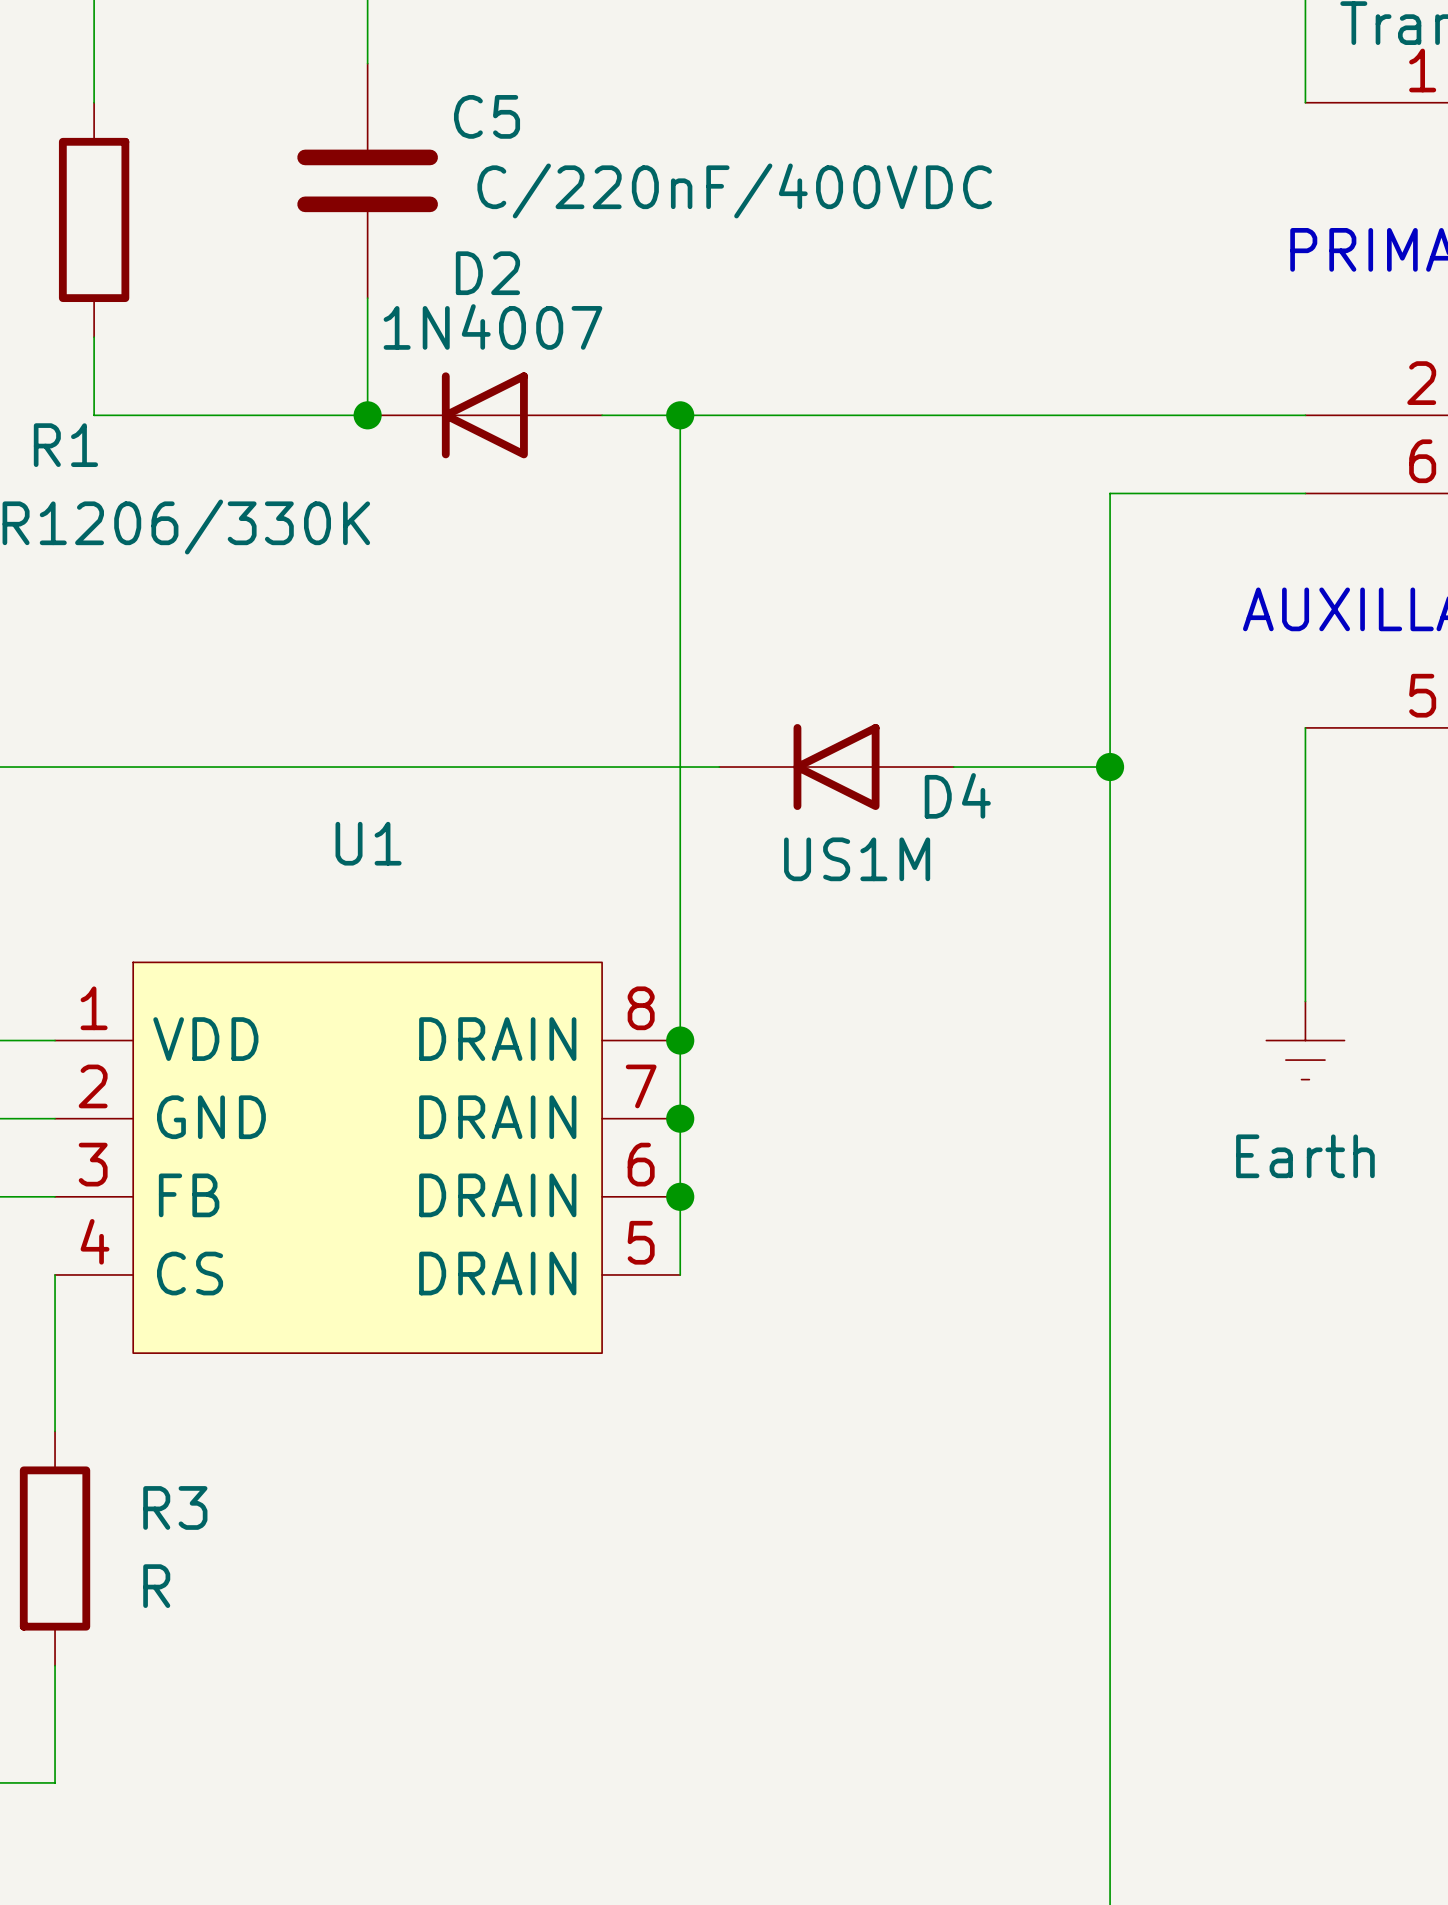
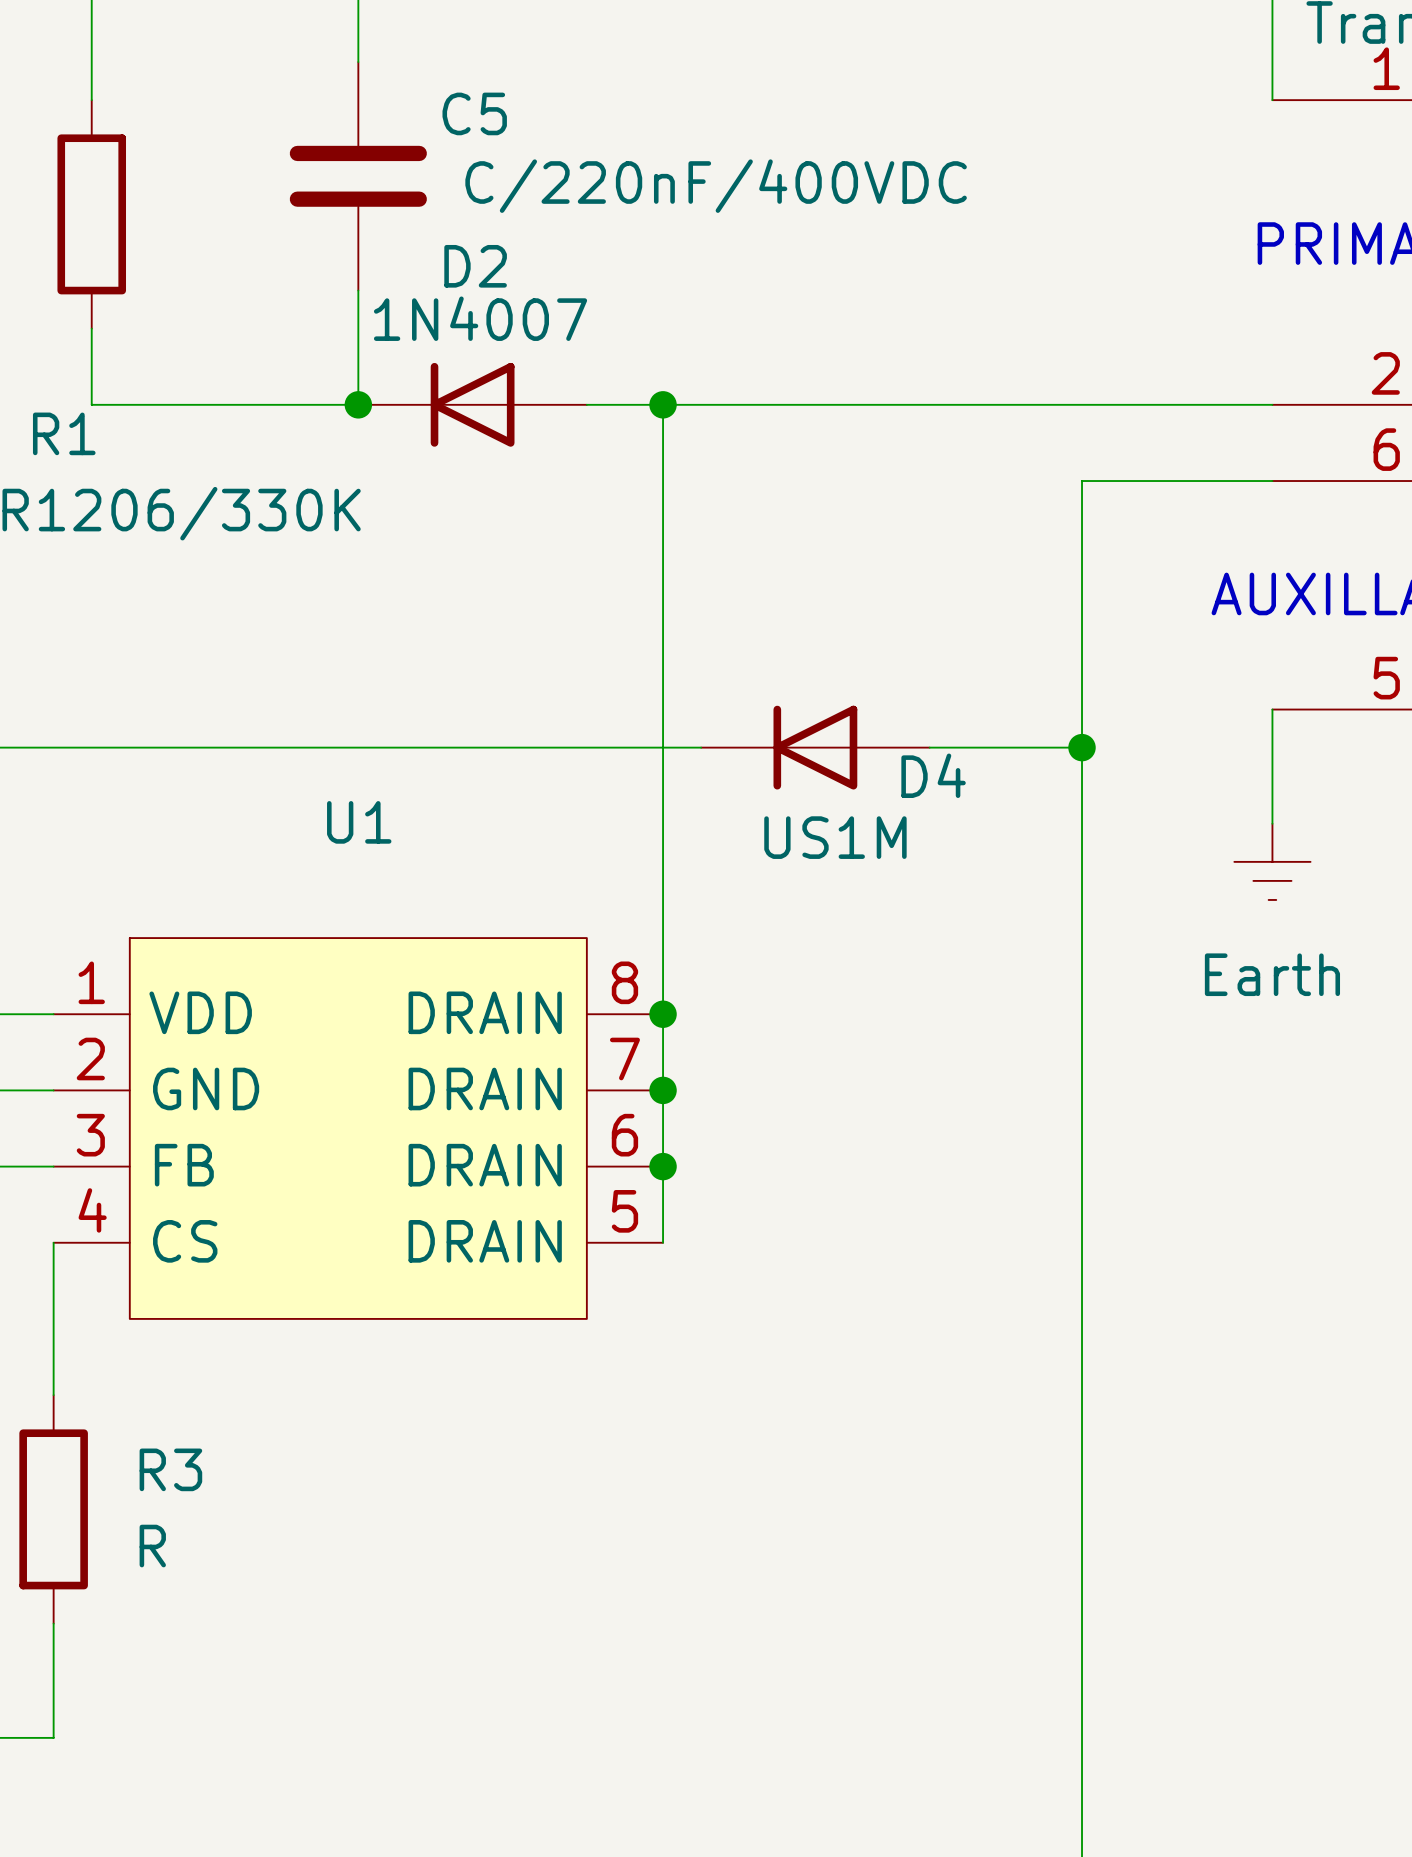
wire: (1305, 845) (1305, 1001) -> none
power symbol position: Earth (1305, 1040) -> Earth (1272, 861)

